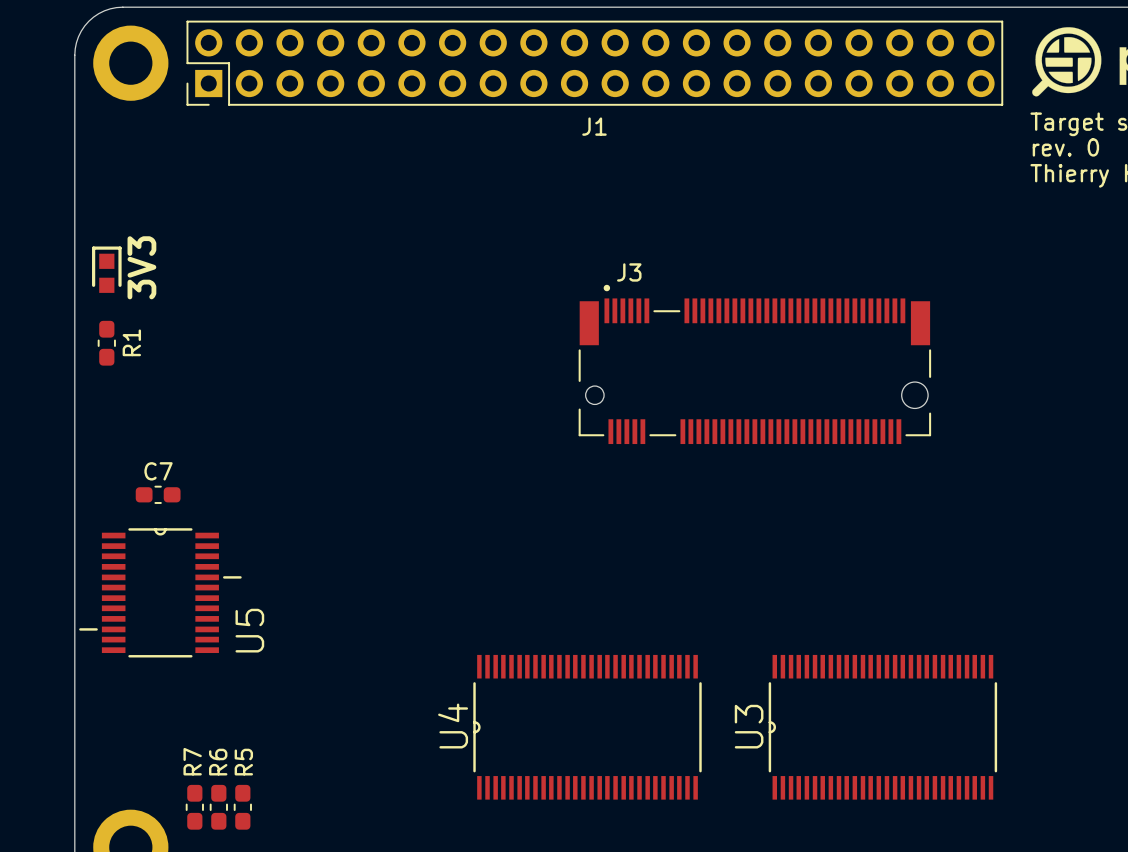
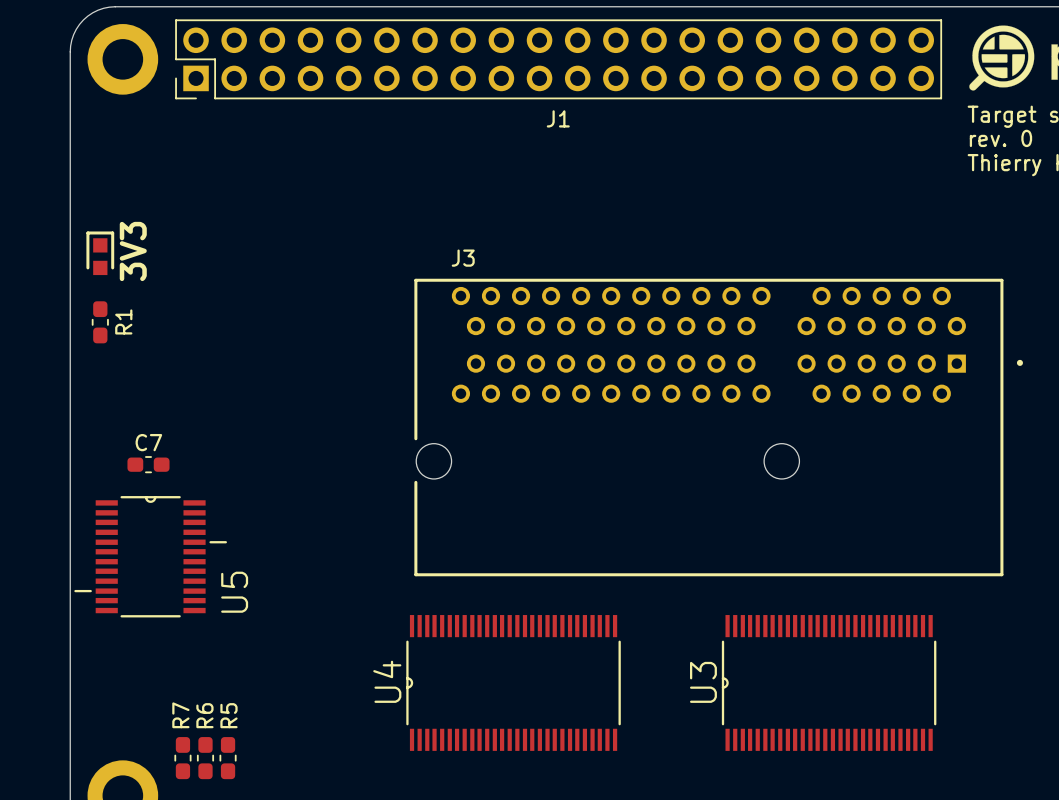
J3 name position: J3 (629, 272) -> J3 (463, 258)
J3 footprint: [578, 284, 932, 445] -> [414, 278, 1023, 577]
U4 position: (587, 727) -> (513, 682)

